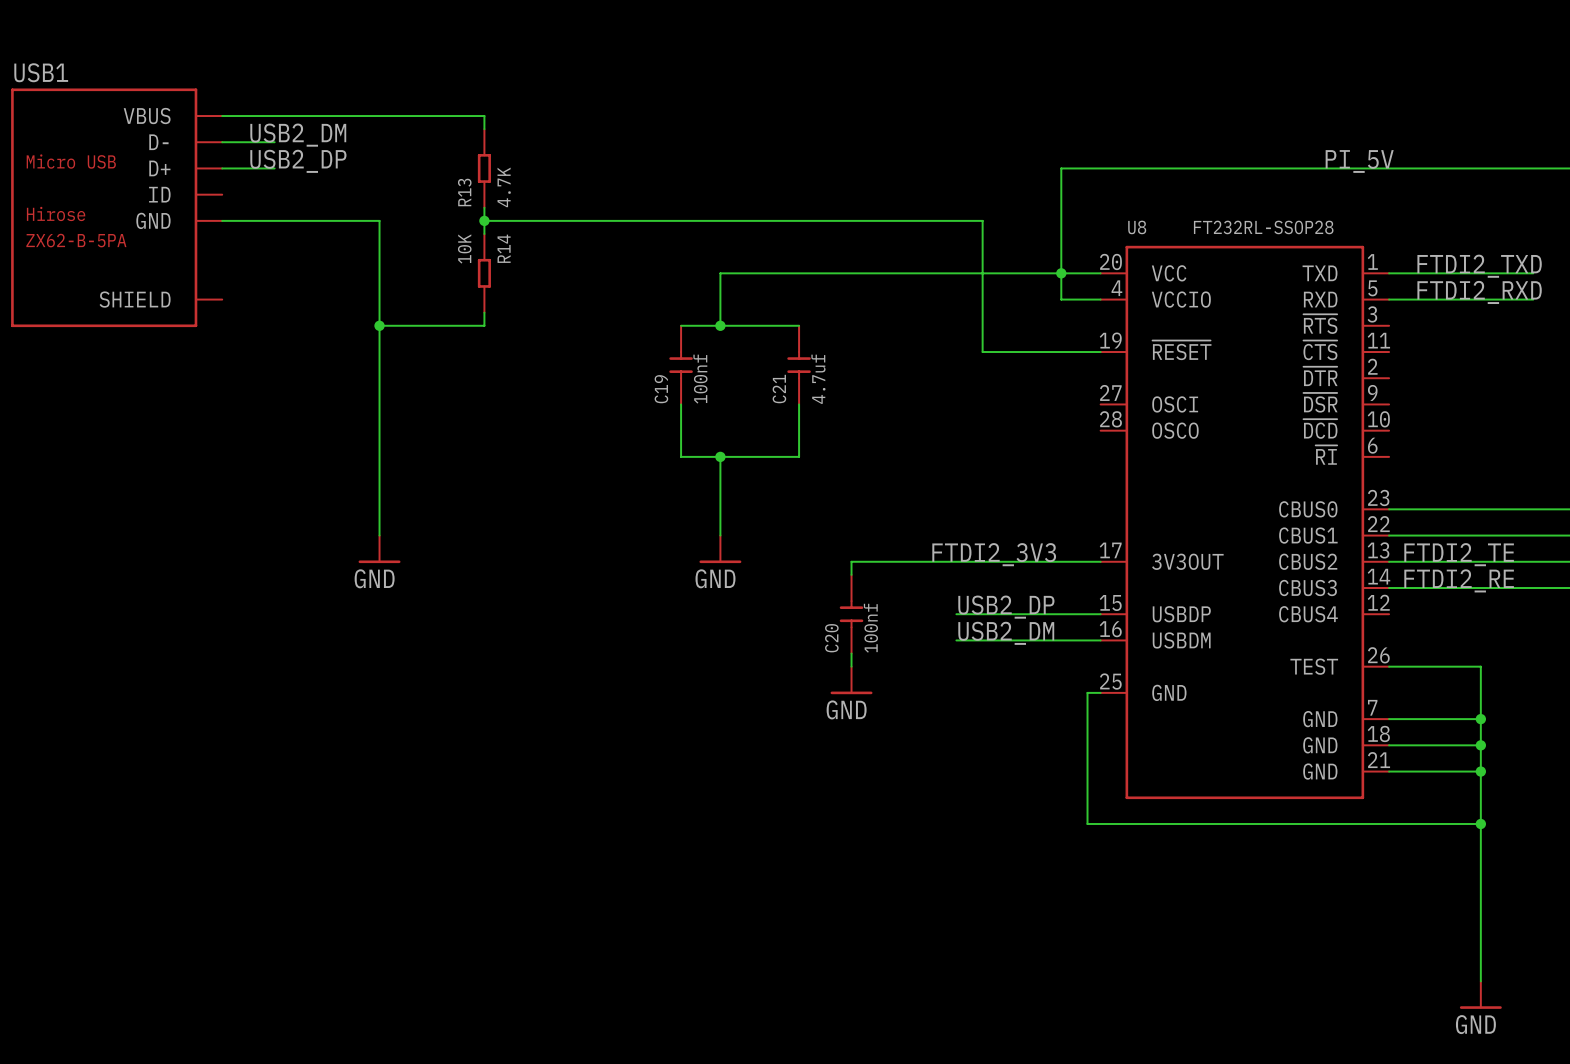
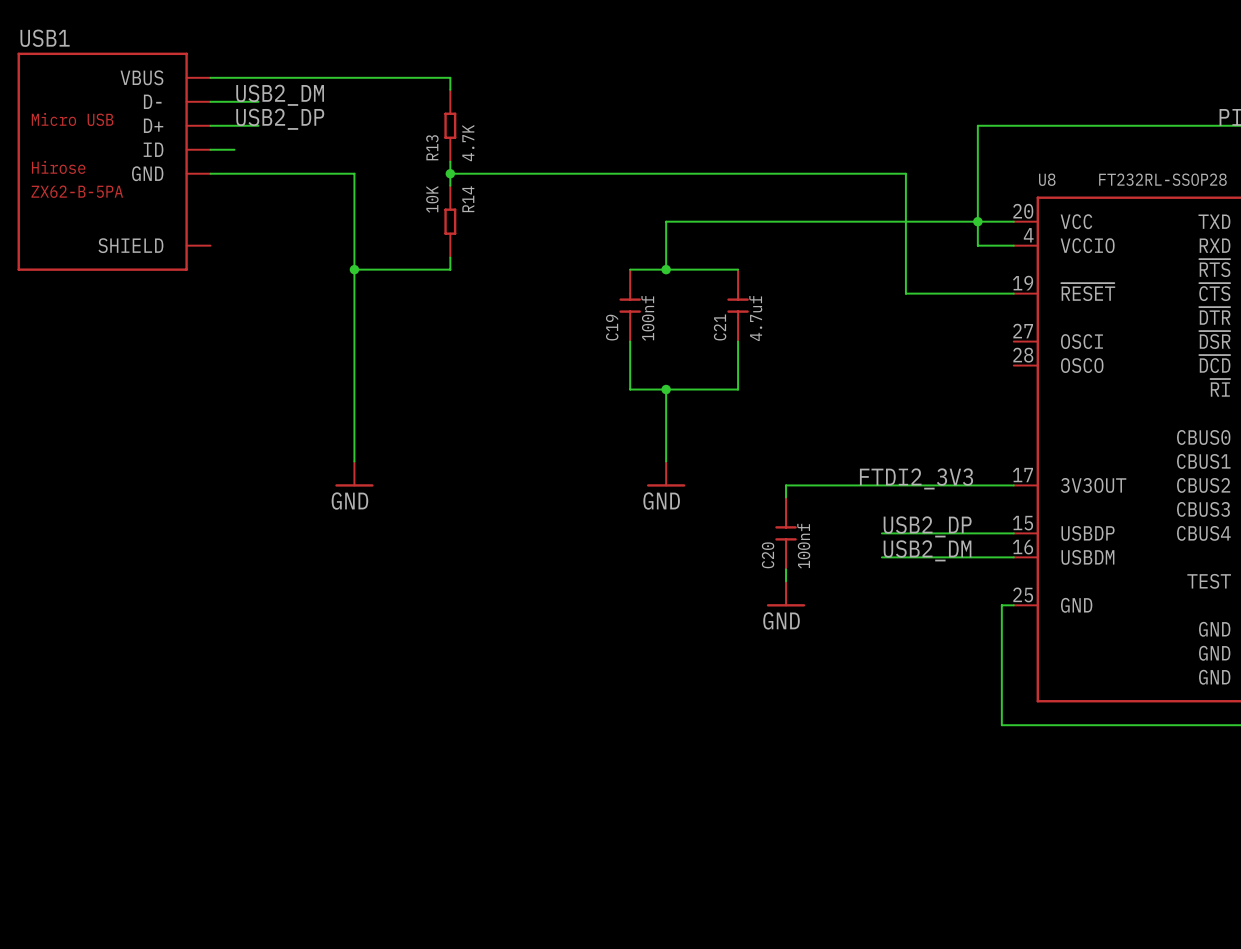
wire: none -> (210, 149) (234, 149)

